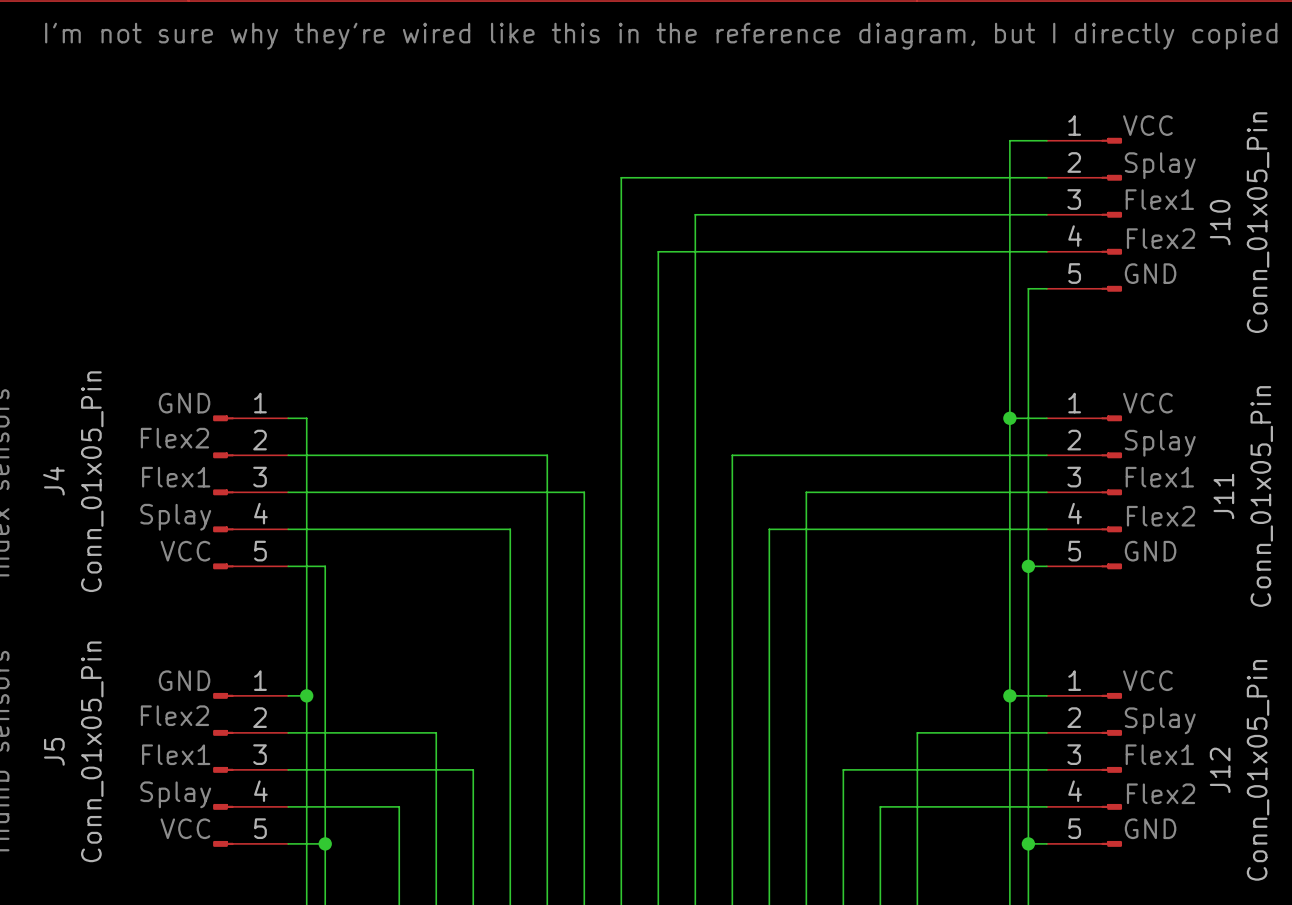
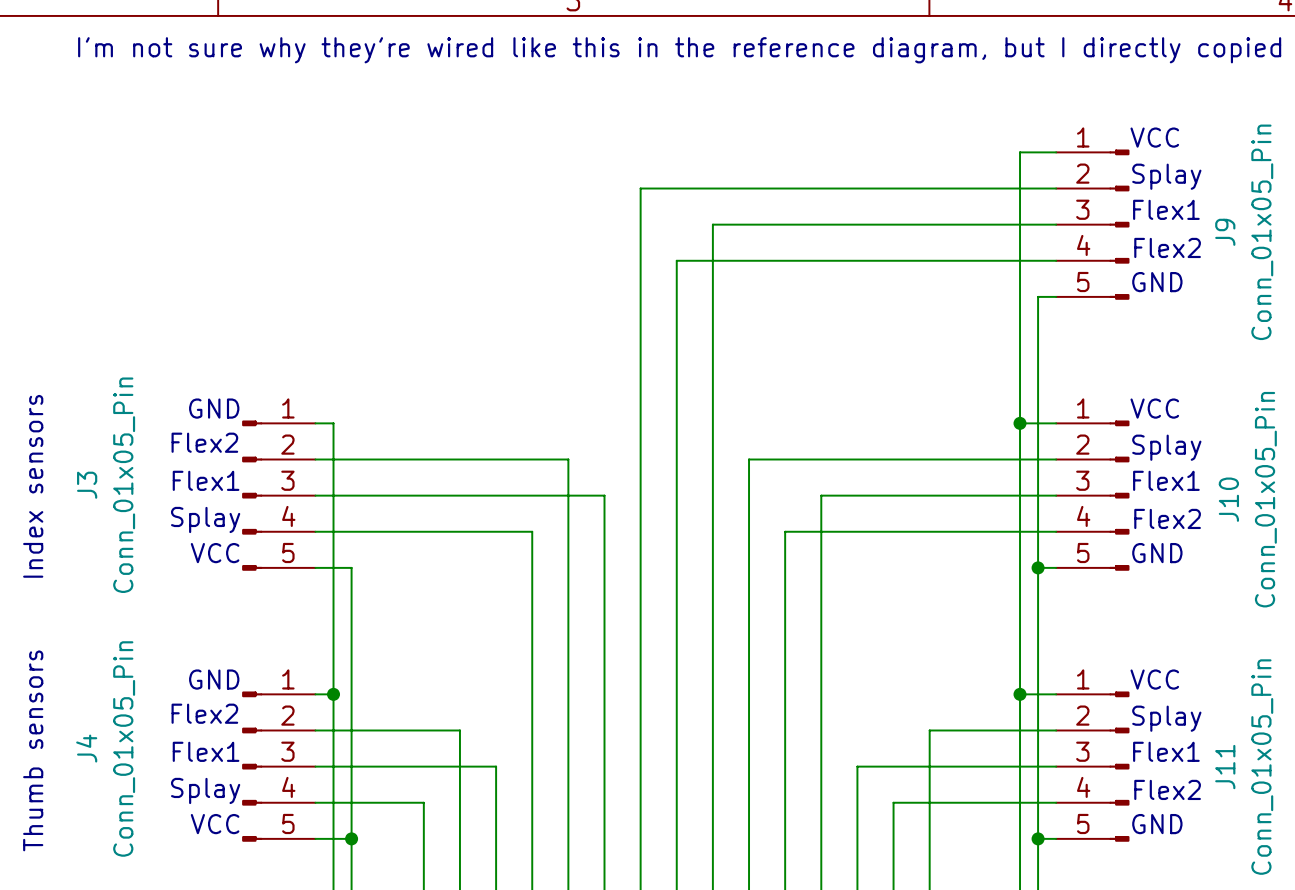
J10 name: J10 (1220, 222) -> J9 (1225, 232)
J4 name: J4 (53, 481) -> J3 (87, 485)
J11 name: J11 (1223, 496) -> J10 (1228, 499)
J5 name: J5 (54, 751) -> J4 (86, 748)
J12 name: J12 (1220, 770) -> J11 (1225, 767)

